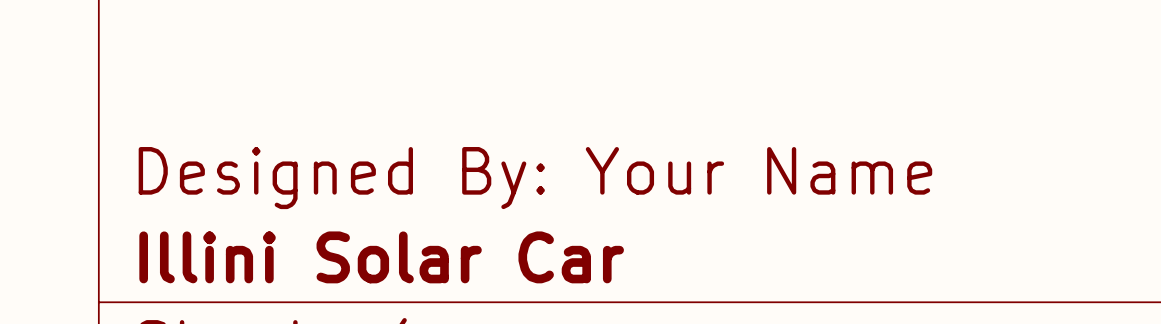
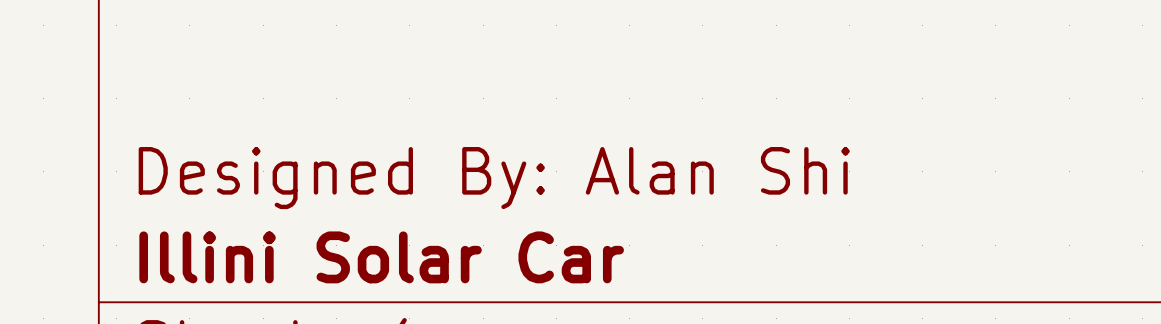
title block: Designed By: Your Name (535, 178) -> Designed By: Alan Shi (494, 178)

